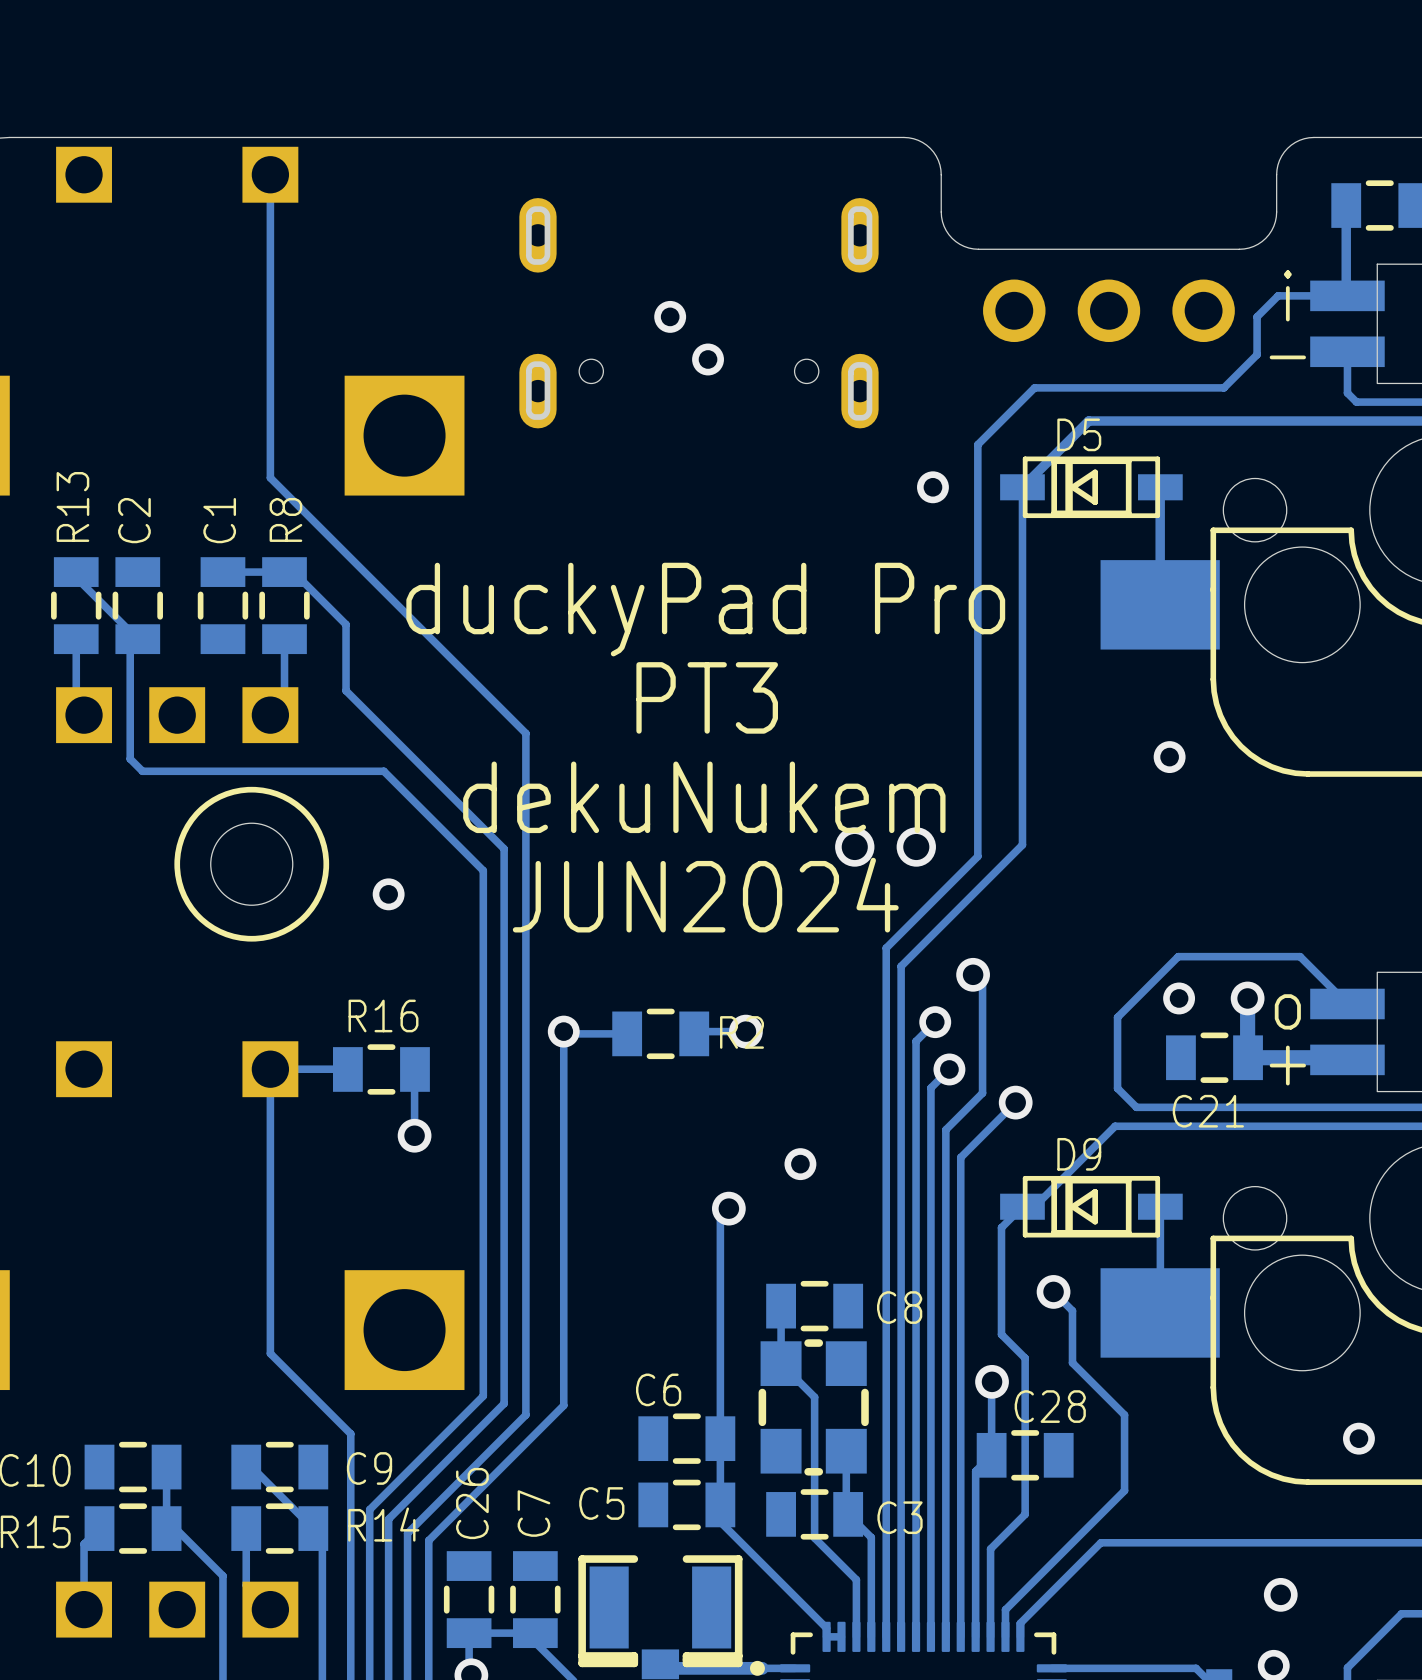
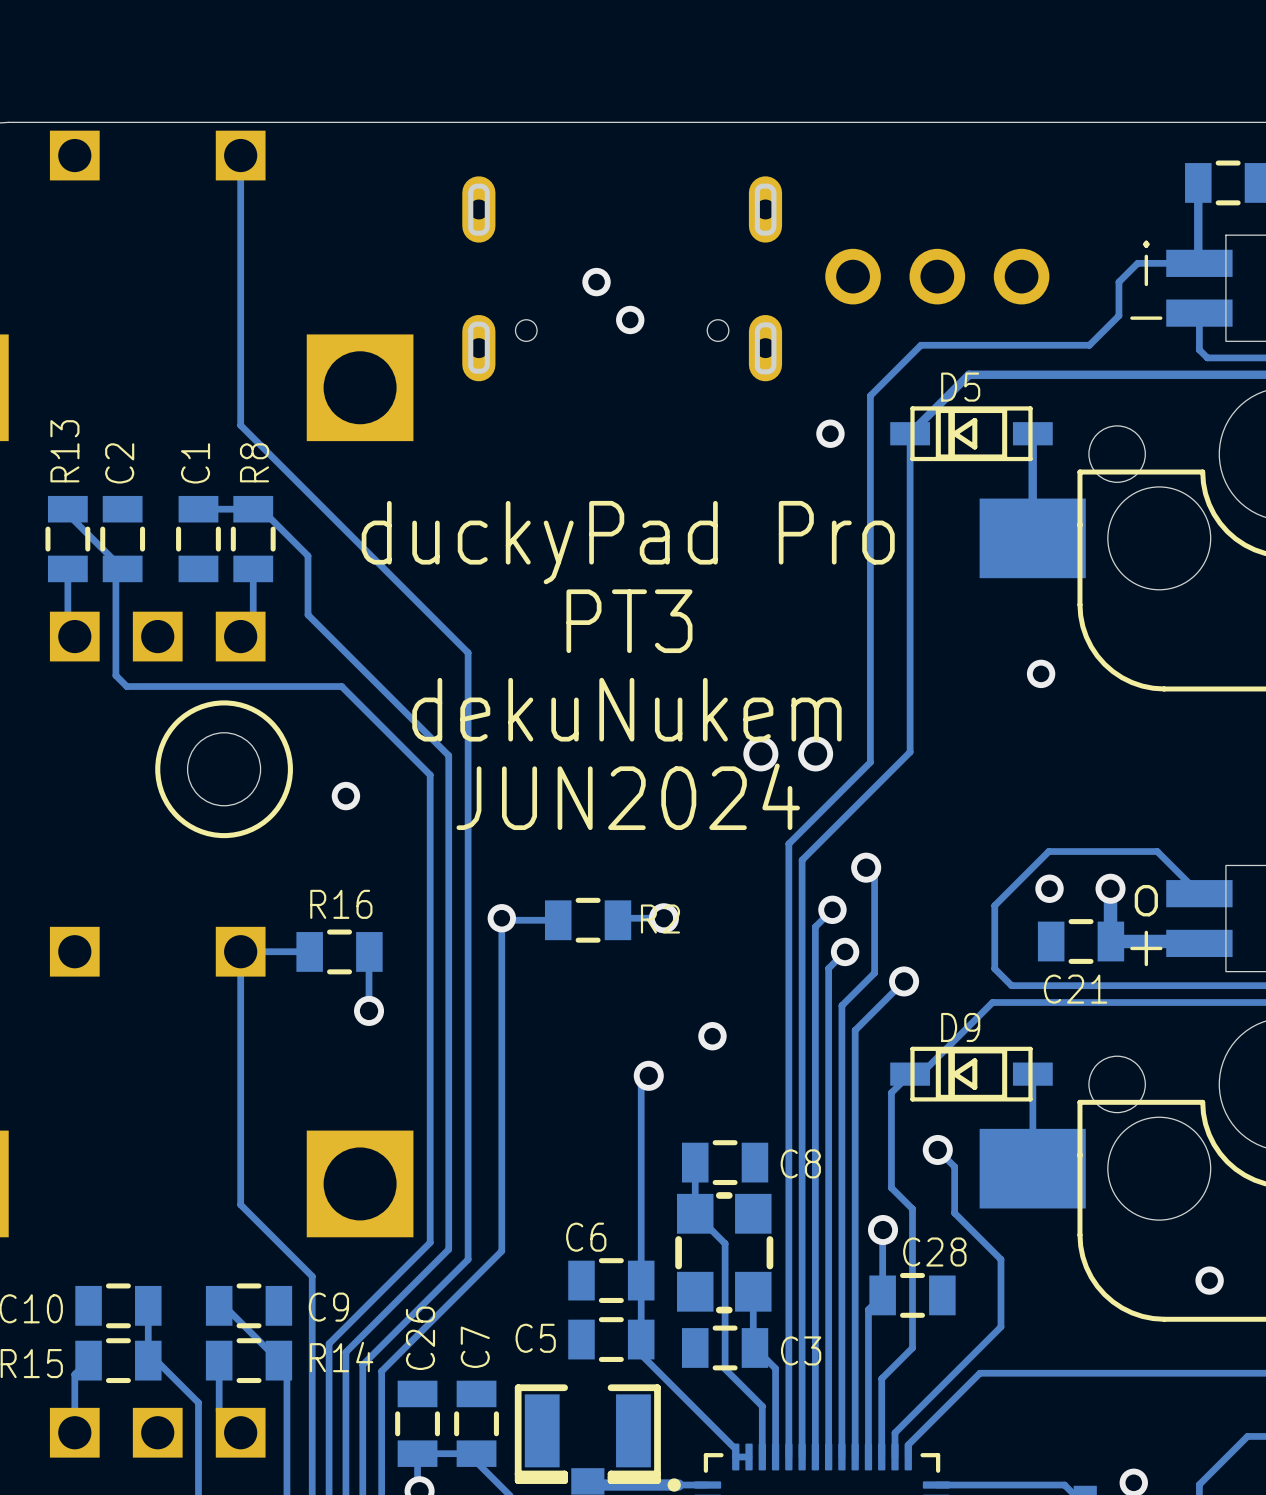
board edge: (1313, 137) (1295, 142) (1281, 156) (1276, 169) (1276, 212) (1273, 226) (1262, 241) (1253, 246) (1239, 249) (968, 248) (955, 241) (944, 226) (941, 212) (940, 169) (936, 156) (922, 142) (903, 137) -> (1169, 122) (804, 122)
part position: (1108, 310) -> (937, 276)
via: (1280, 1594) -> none

